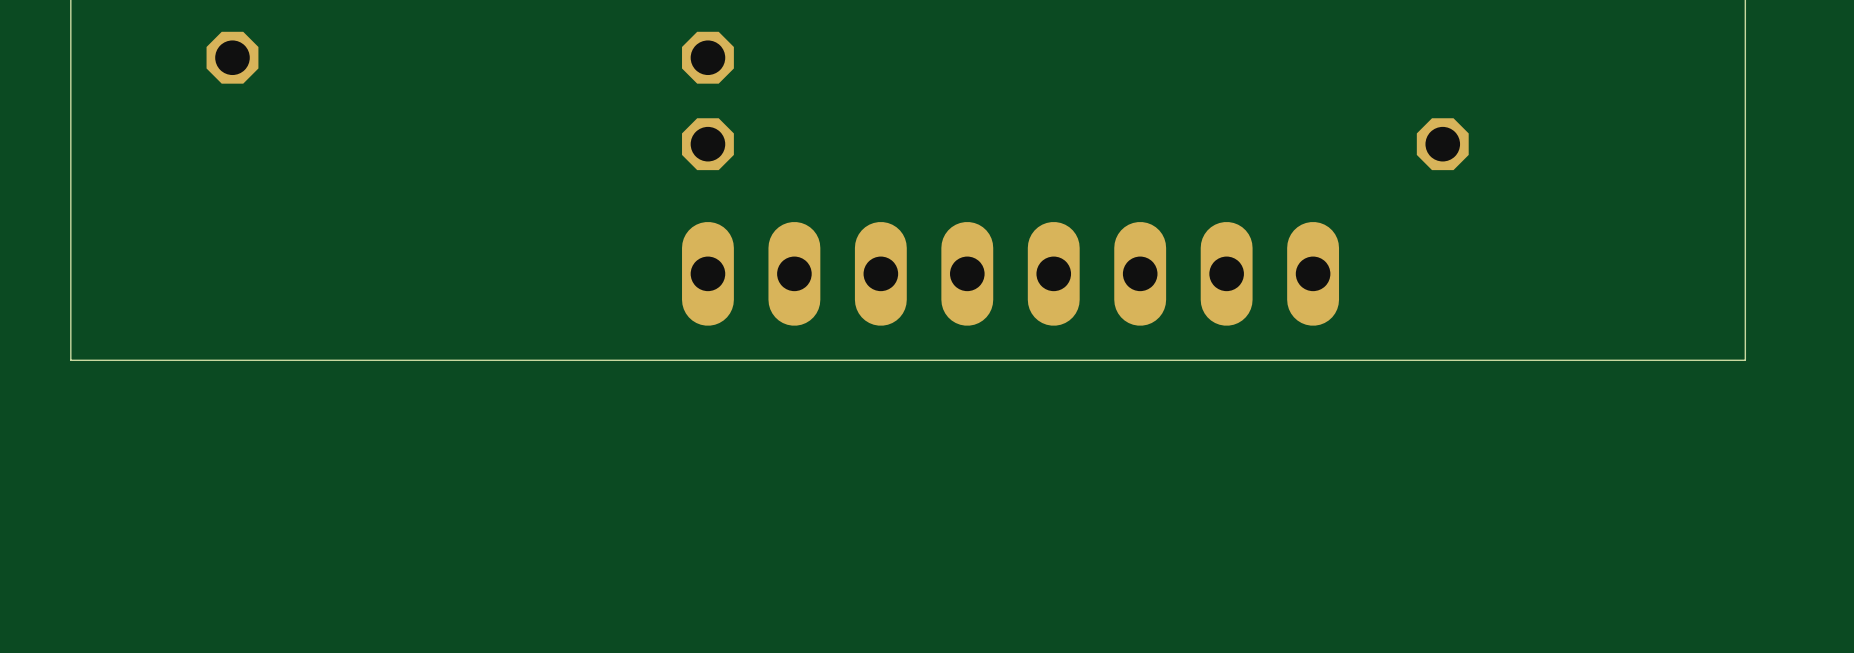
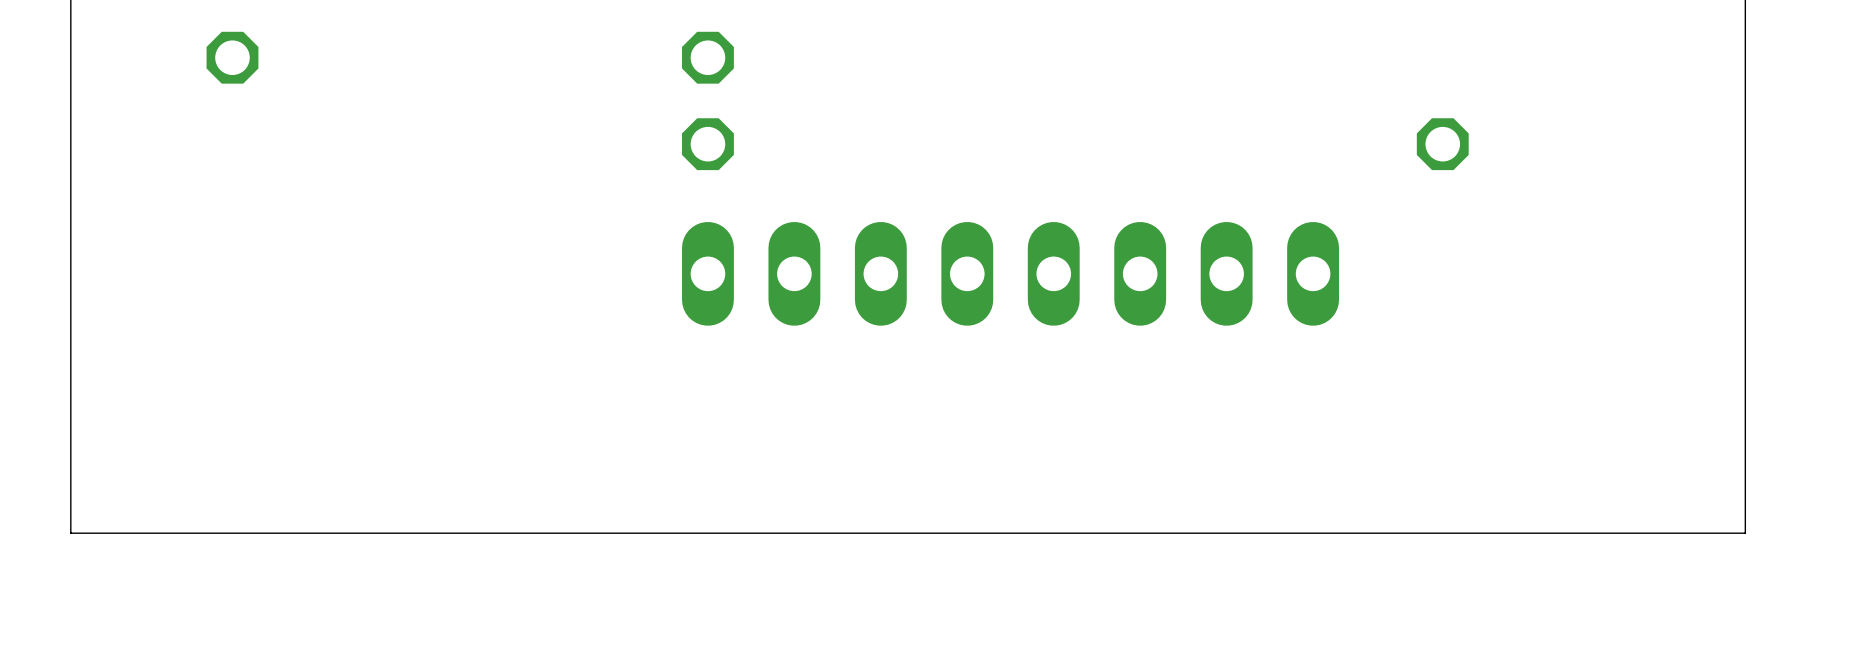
board edge: (1745, 360) (70, 360) -> (1745, 360) (1745, 533) (70, 533) (70, 360)

